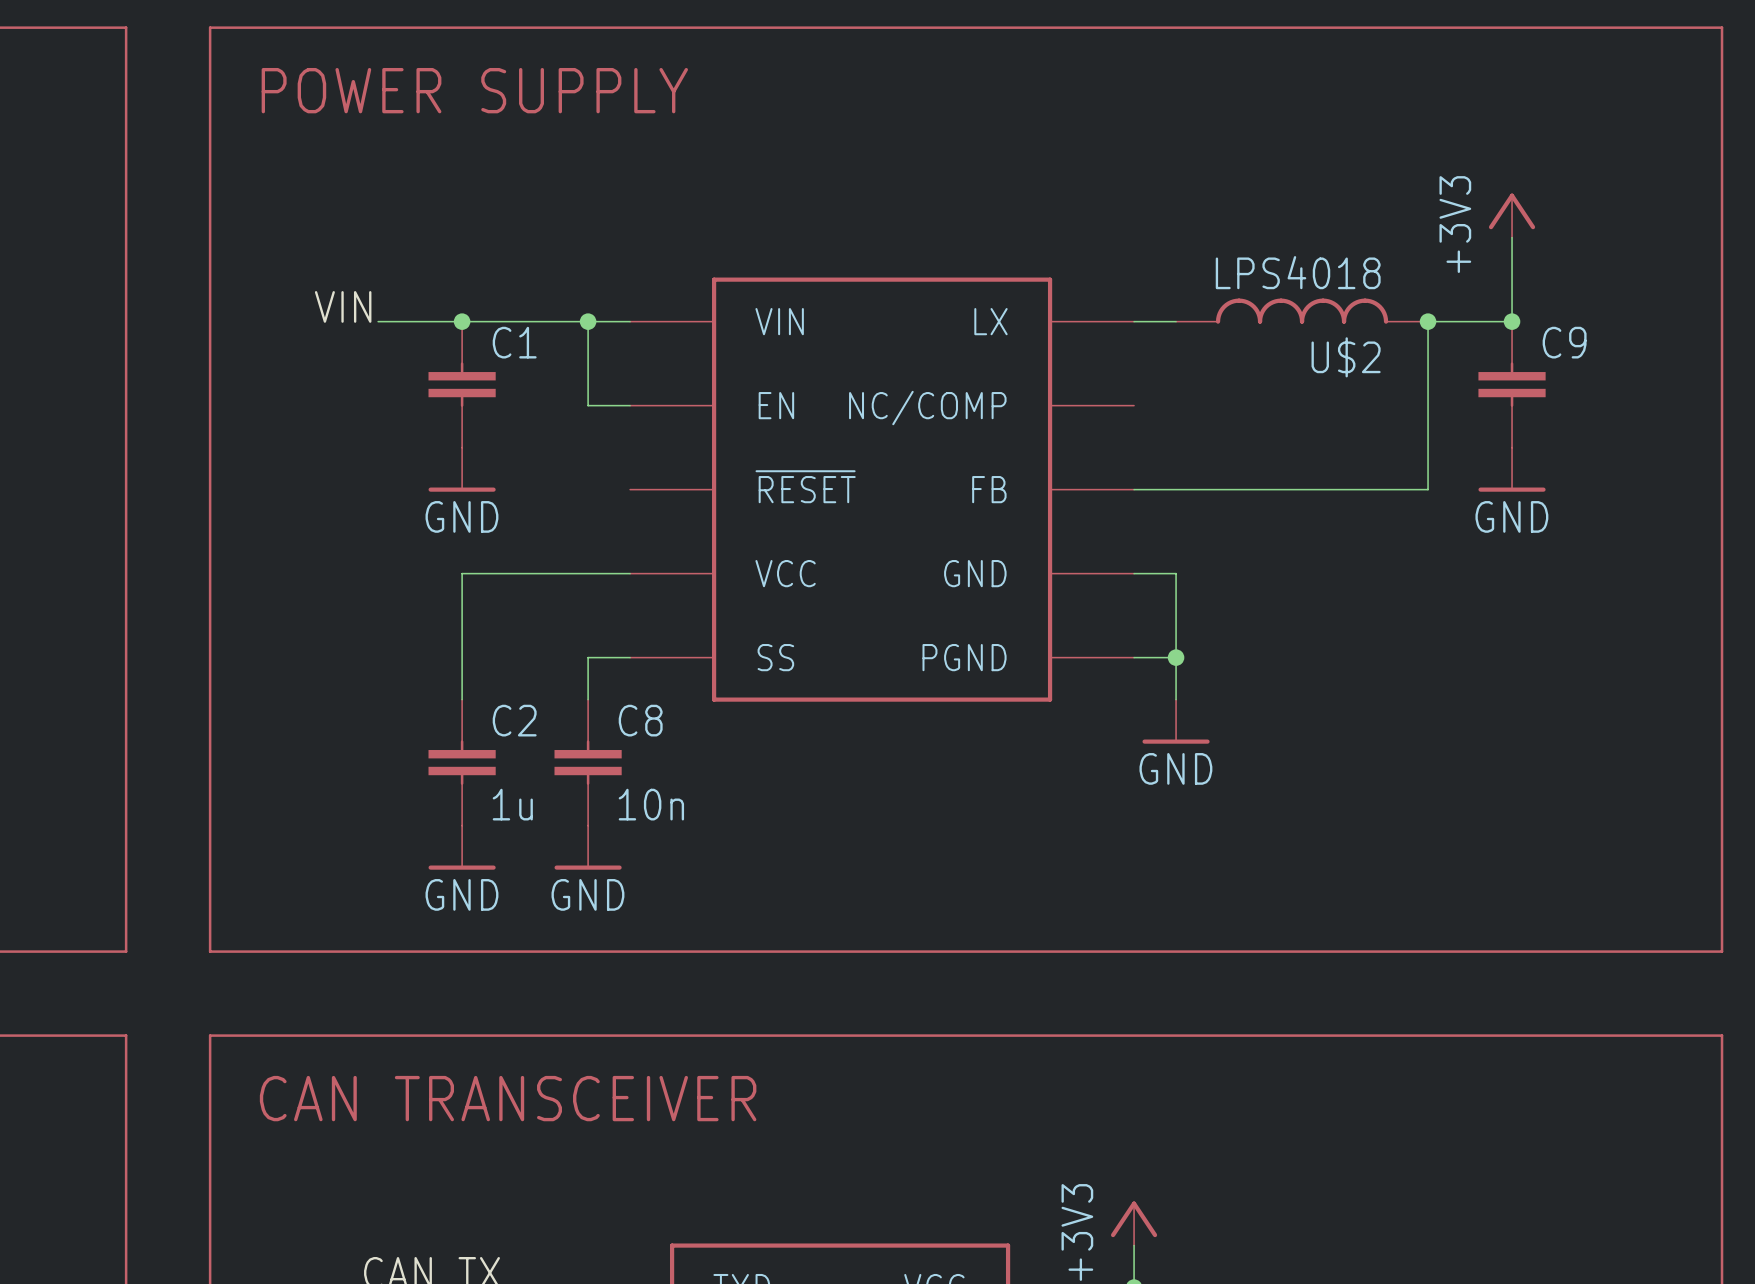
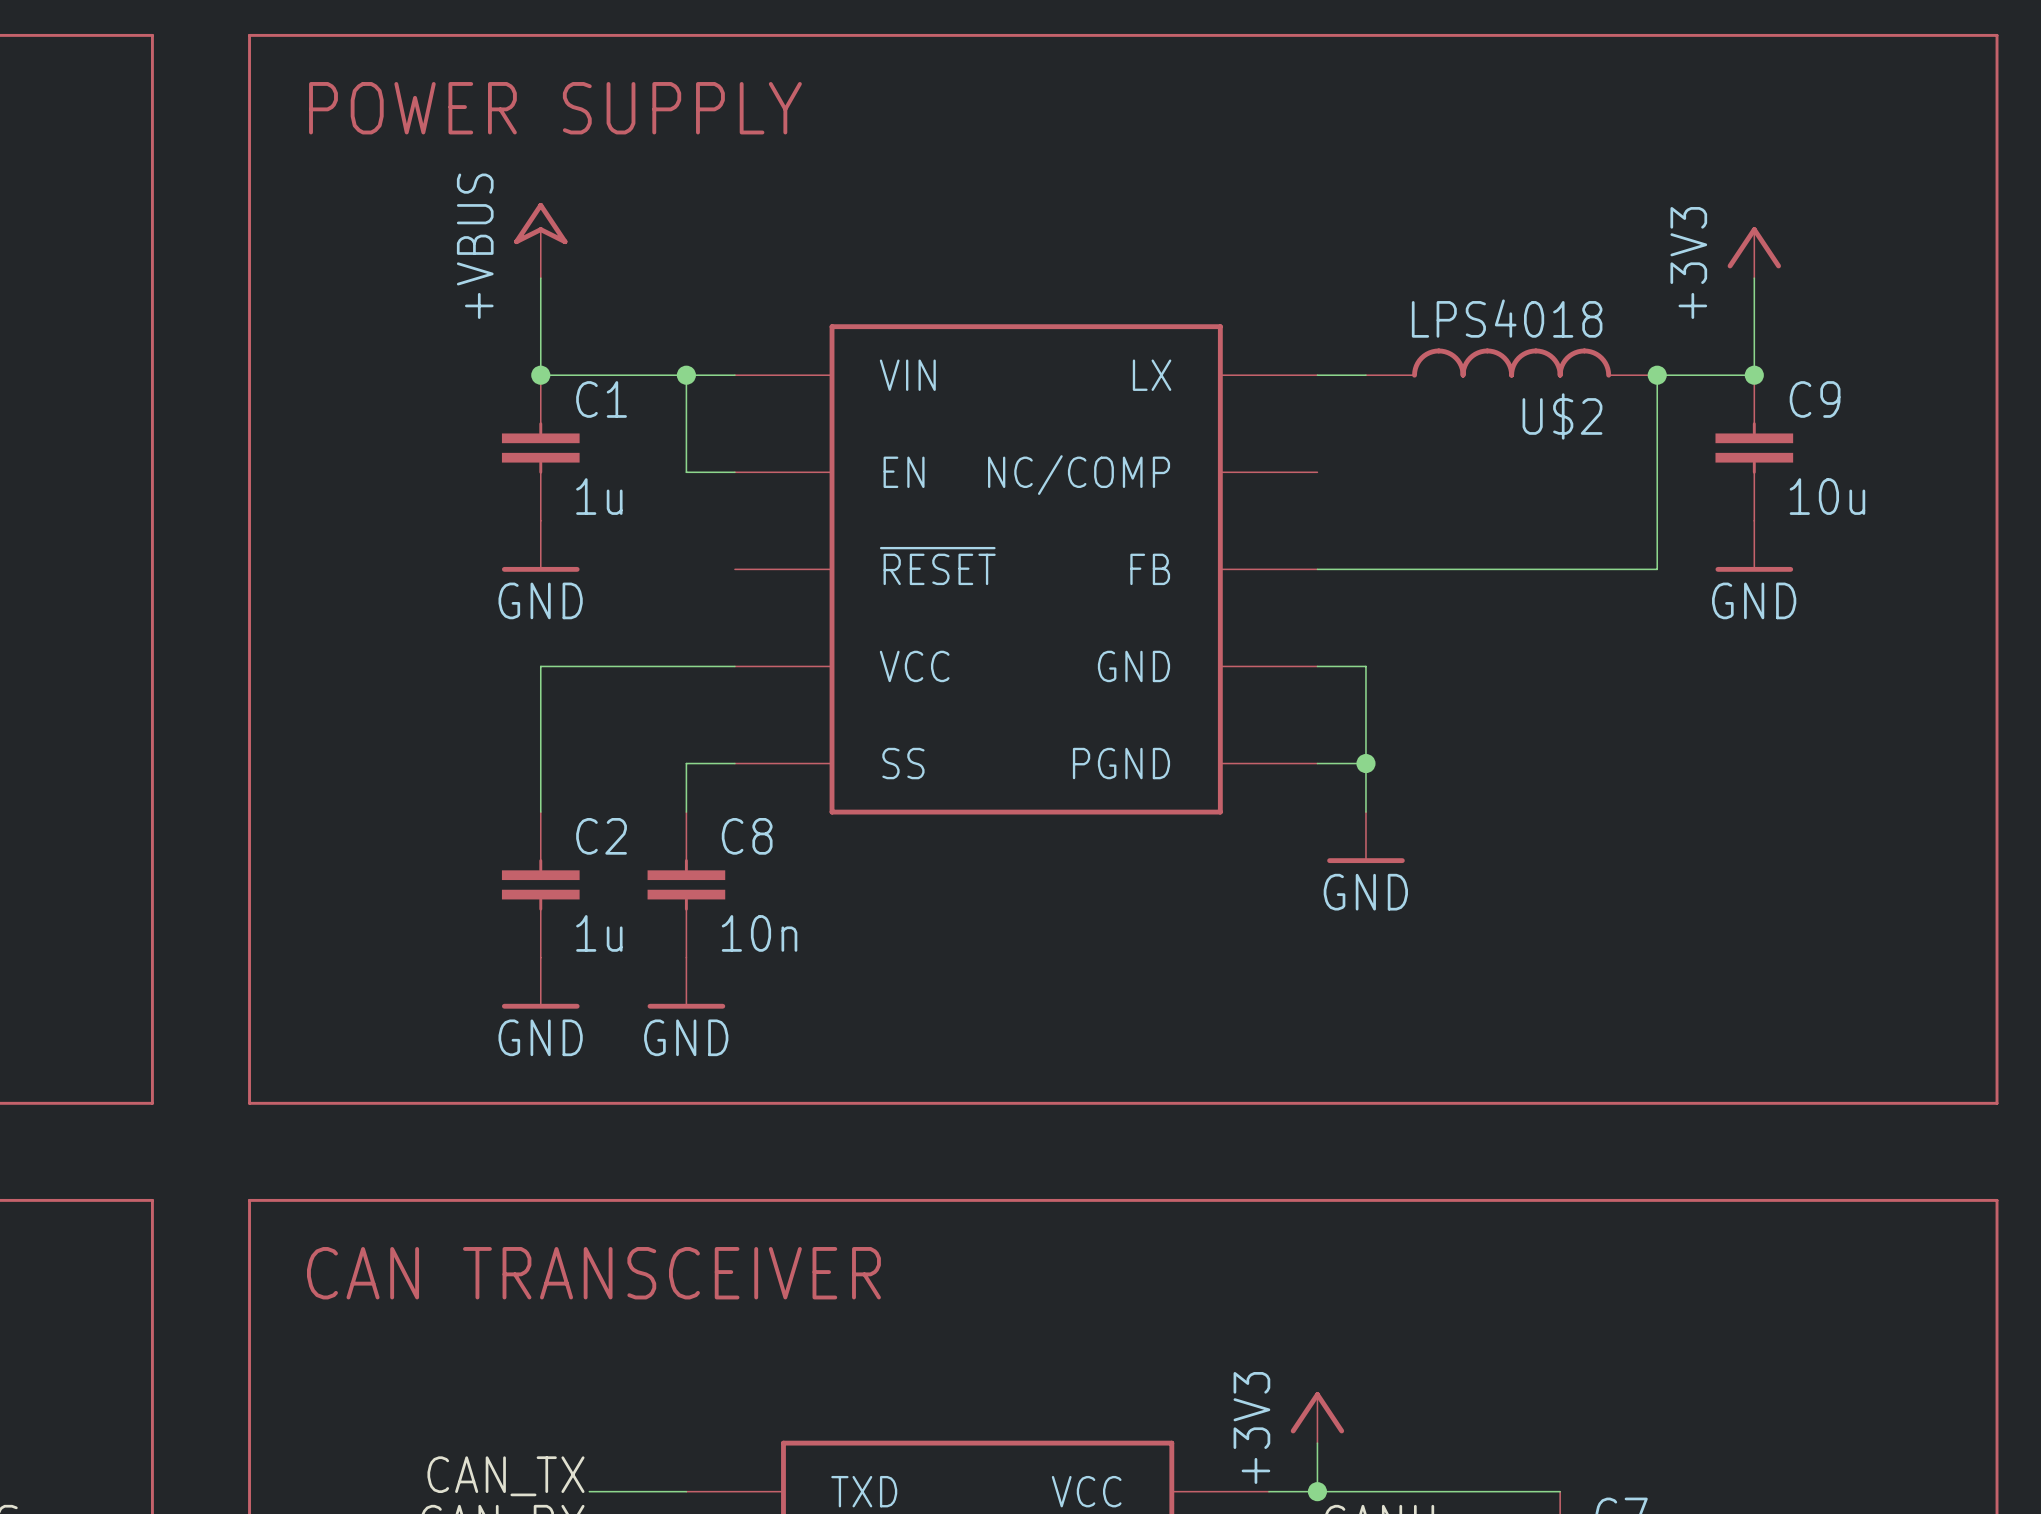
power symbol: none -> +VBUS (540, 240)
label: VIN (343, 306) -> none
wire: (378, 321) (462, 321) -> (540, 278) (540, 375)
C1 value: none -> 1u (599, 496)
C9 value: none -> 10u (1827, 496)

